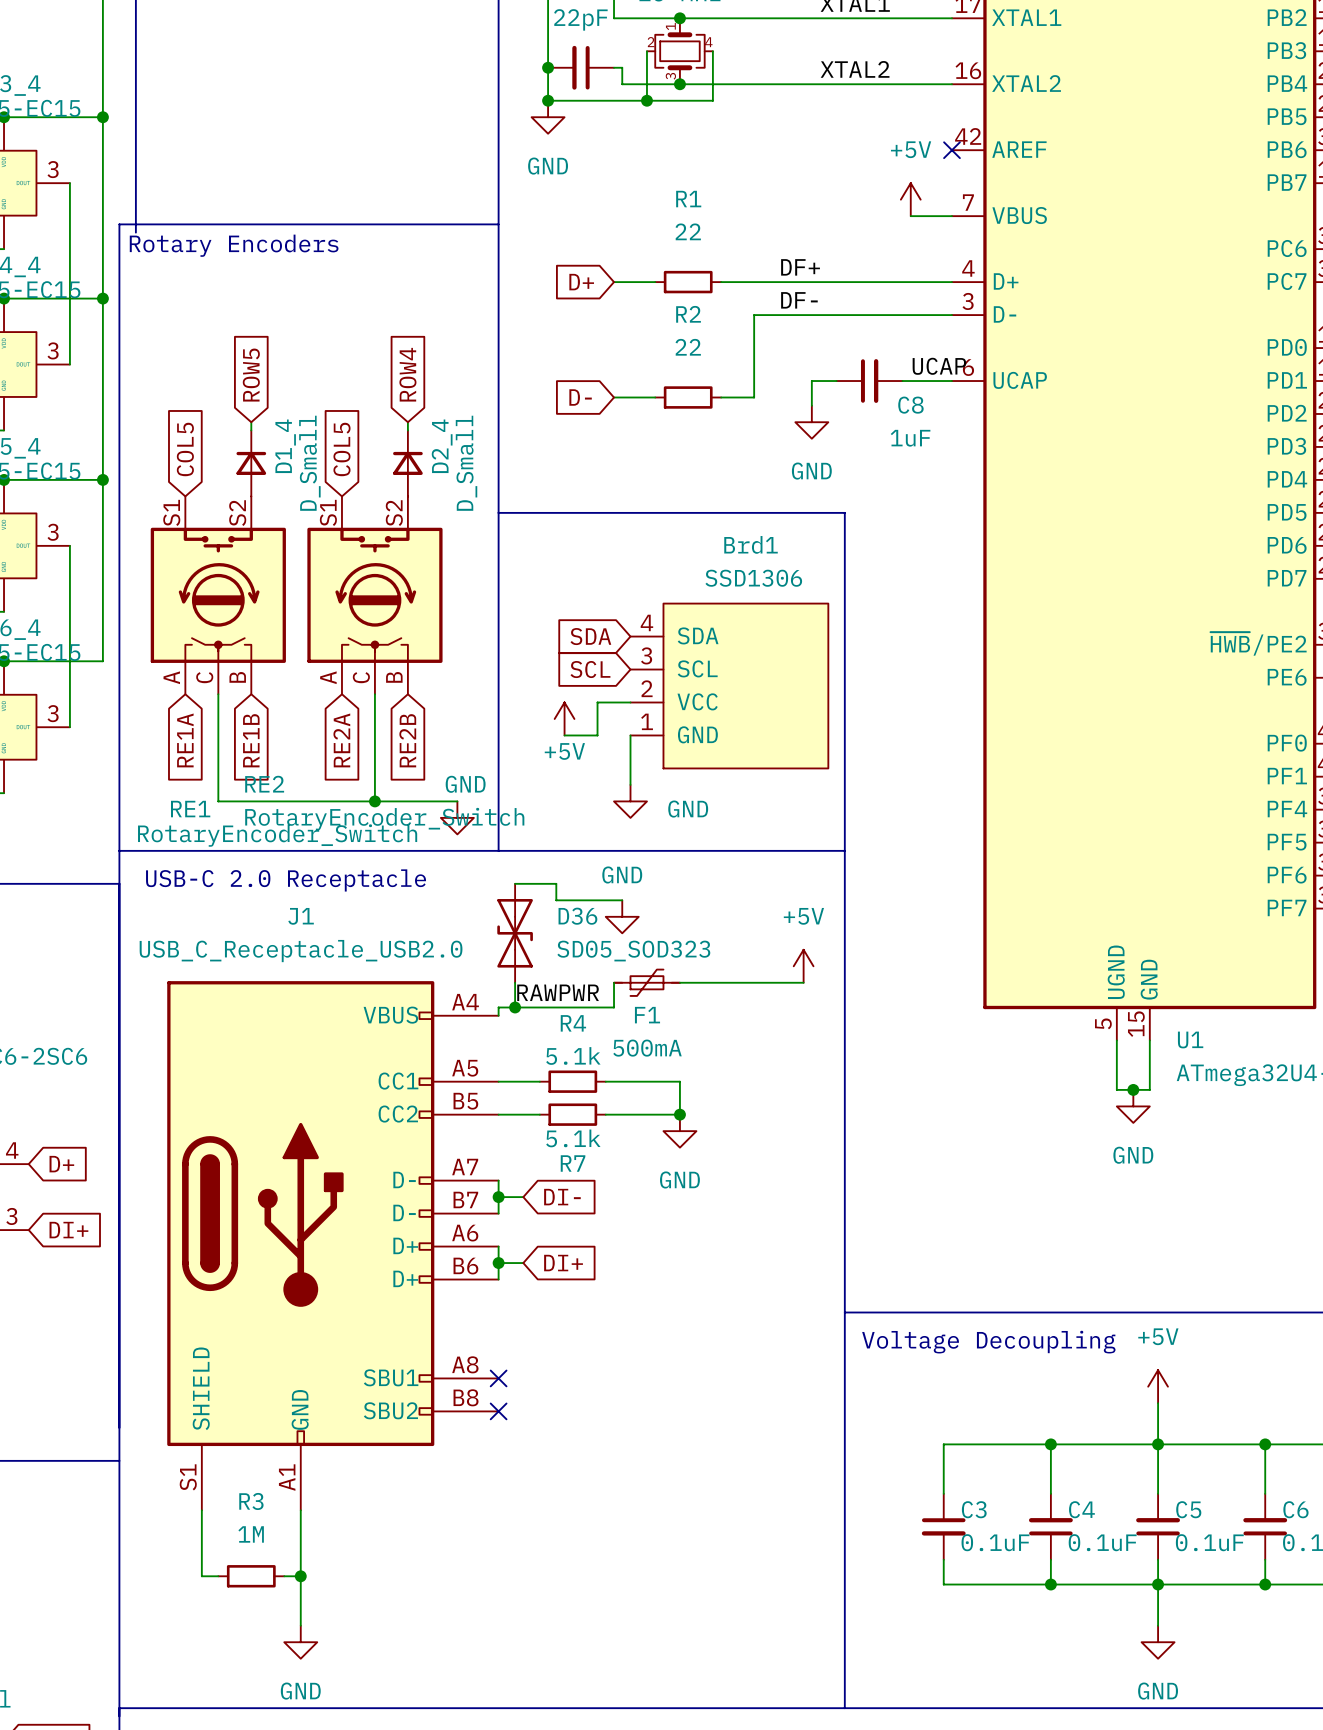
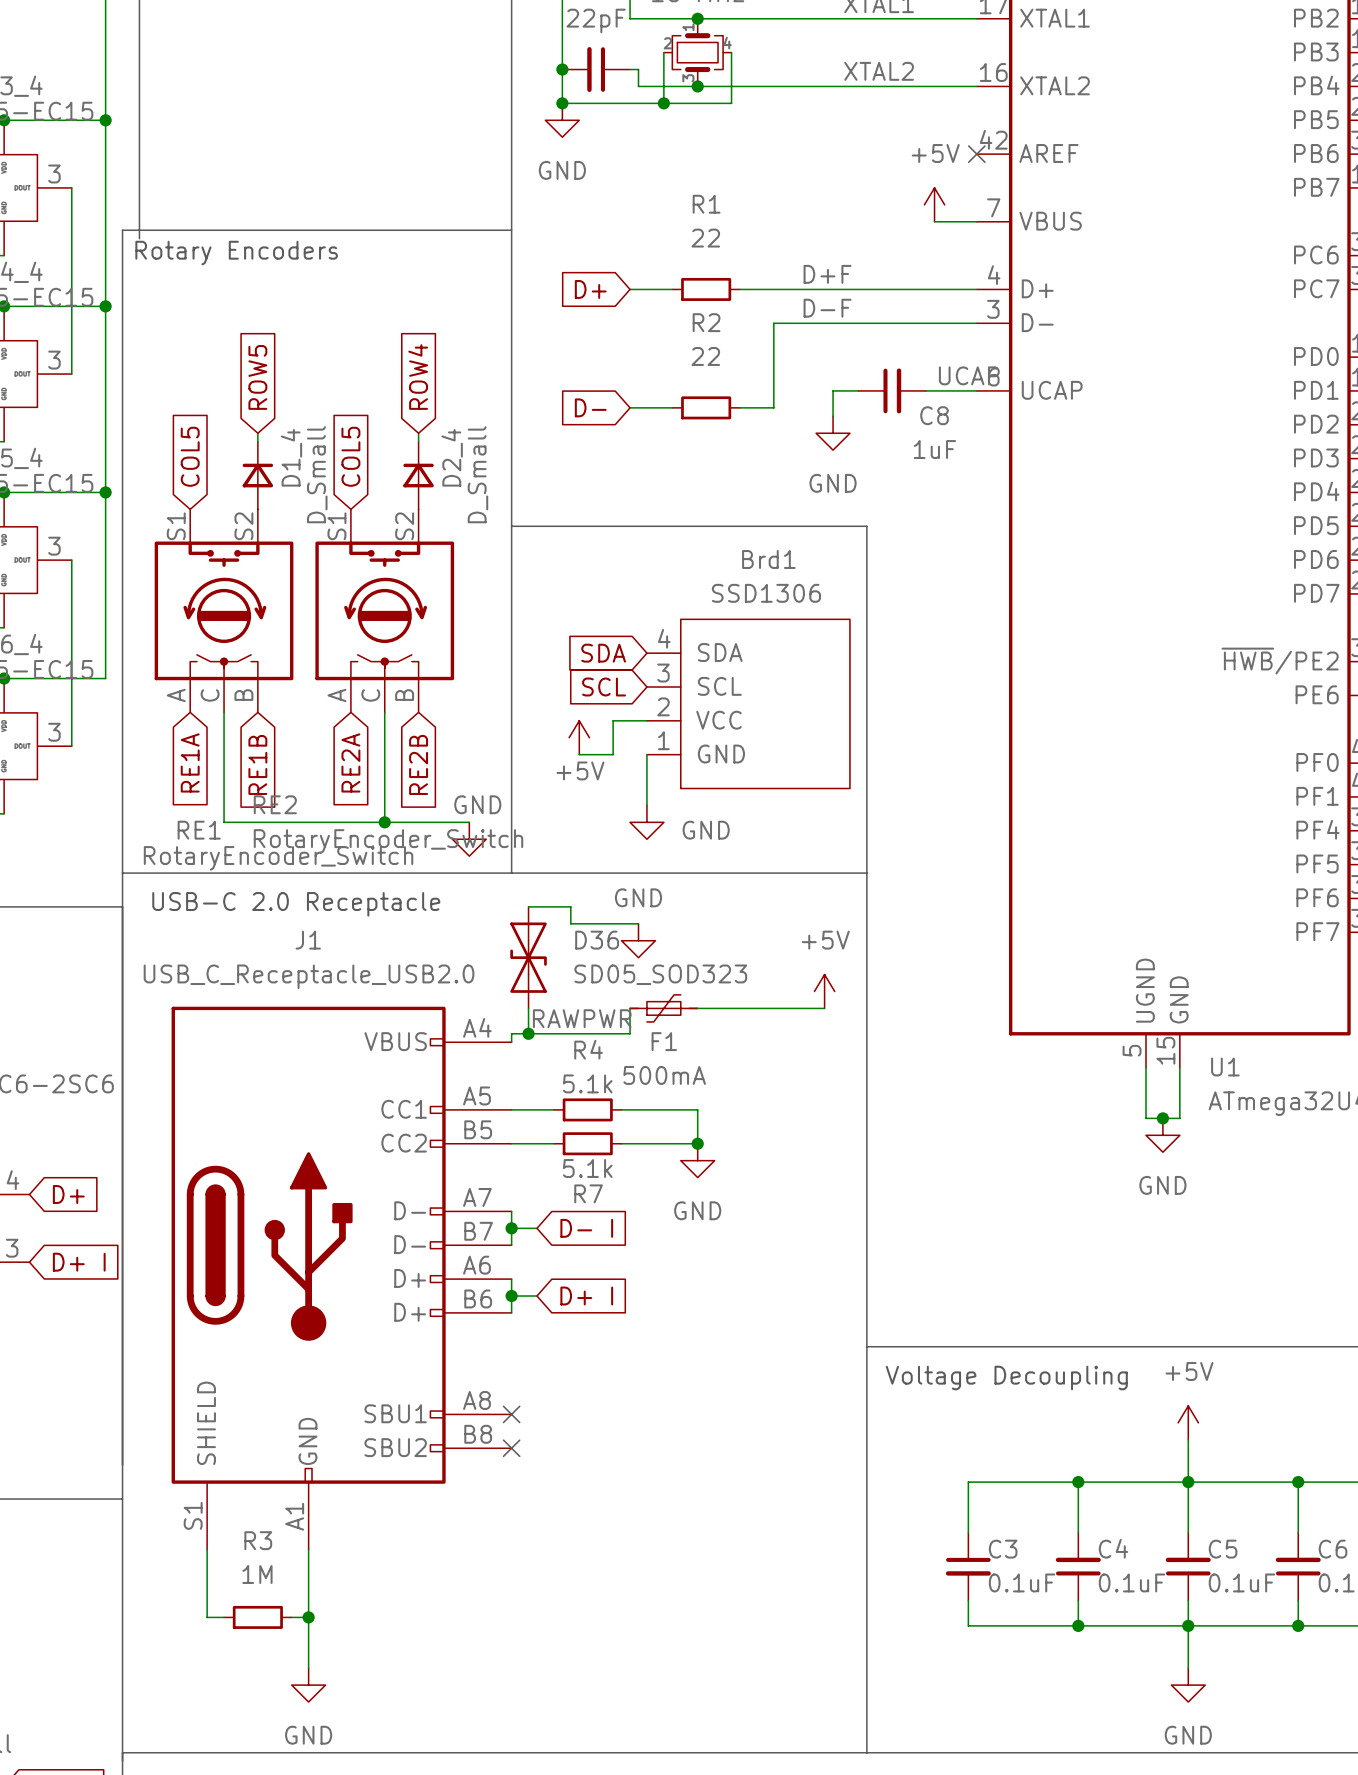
label: DF+ (800, 267) -> D+F (827, 274)
label: DF- (799, 300) -> D-F (827, 308)
global label: DI- (562, 1197) -> D- I (586, 1228)
global label: DI+ (68, 1230) -> D+ I (79, 1262)
global label: DI+ (563, 1263) -> D+ I (586, 1296)

